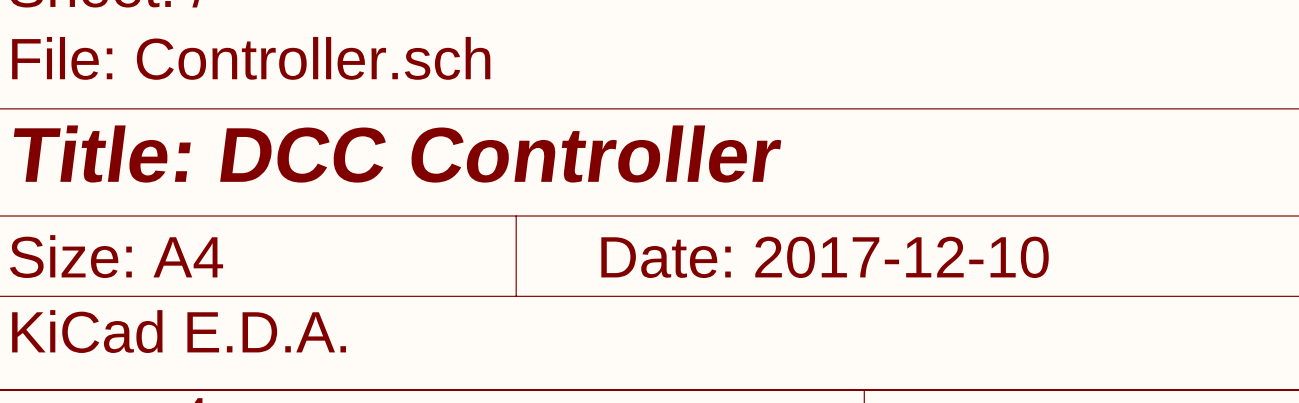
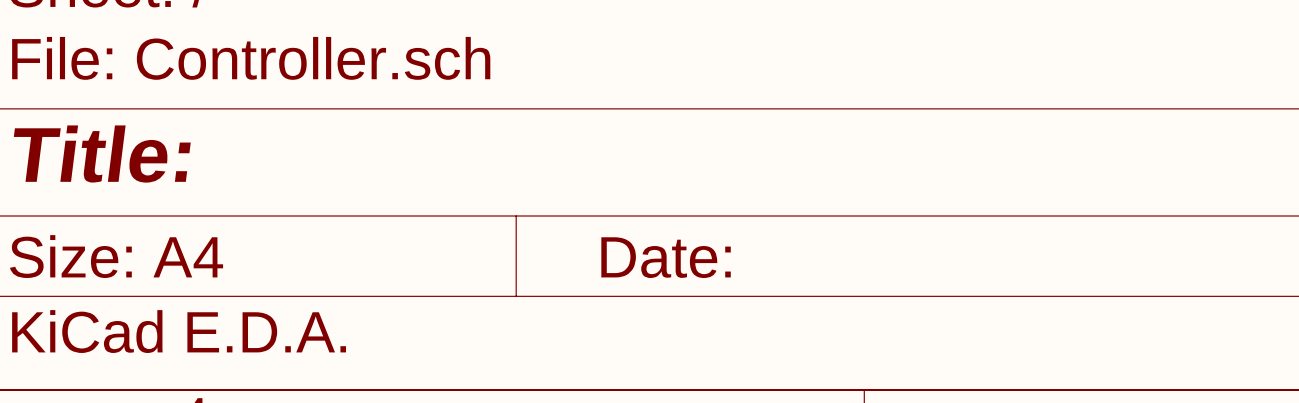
title block: Title: DCC Controller (397, 154) -> Title: (102, 154)
title block: Date: 2017-12-10 (825, 257) -> Date: (666, 257)

